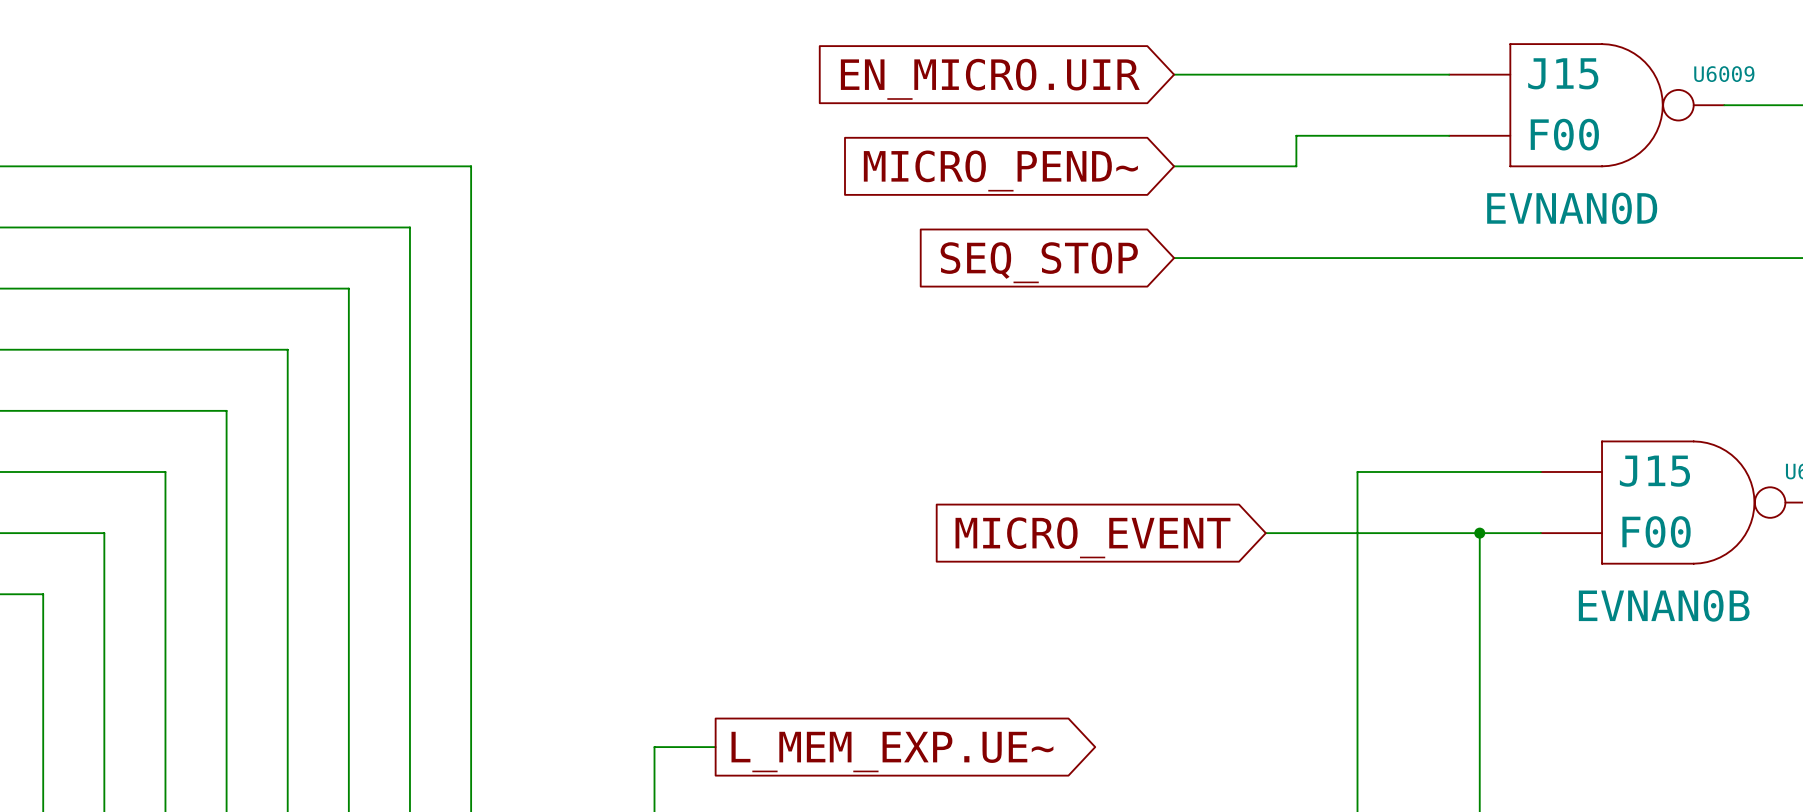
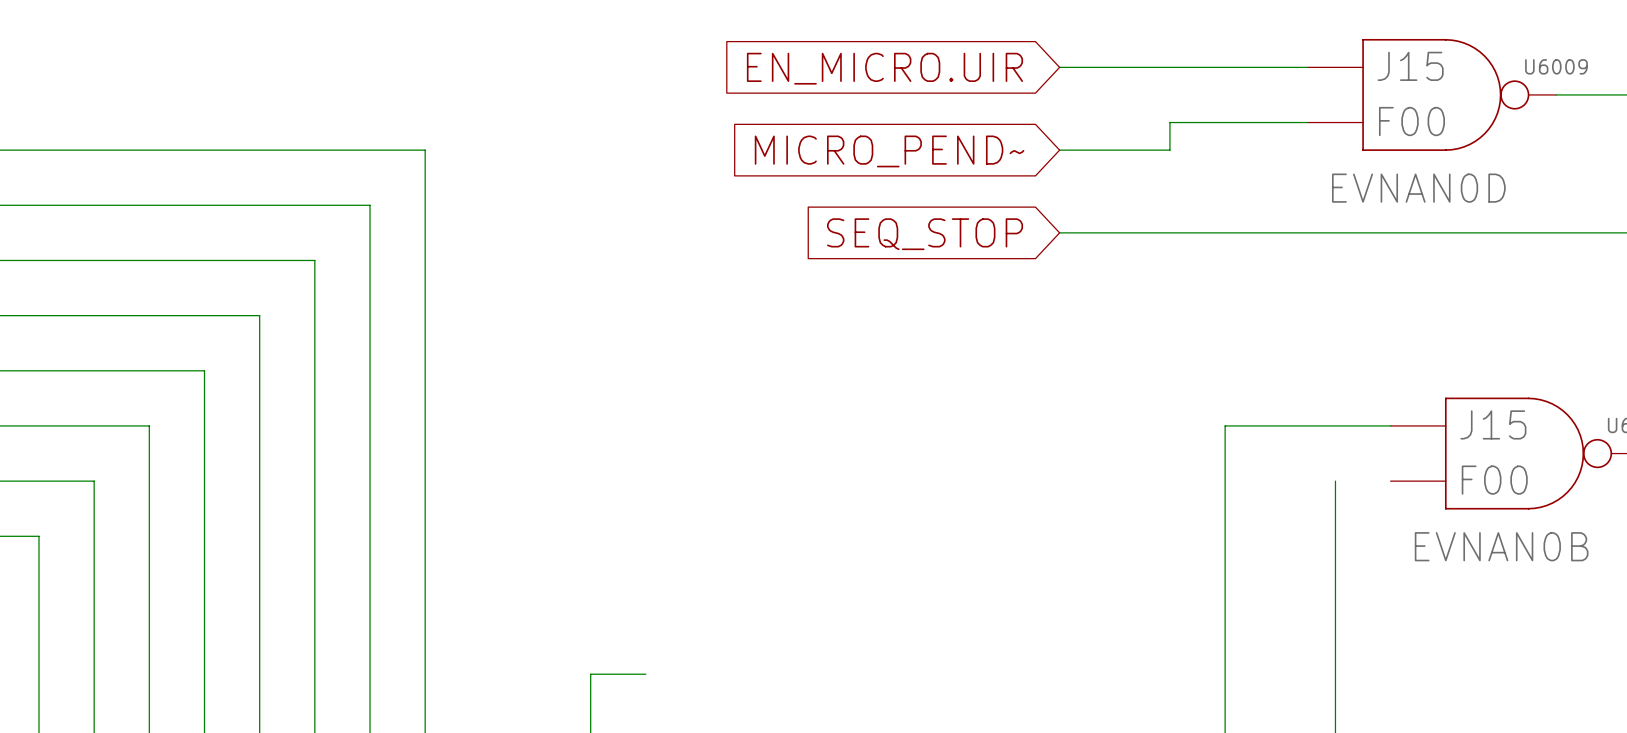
wire: (1265, 533) (1540, 533) -> none
junction: (1479, 533) -> none
global label: MICRO_EVENT (1093, 537) -> none
global label: L_MEM_EXP.UE~ (892, 752) -> none

